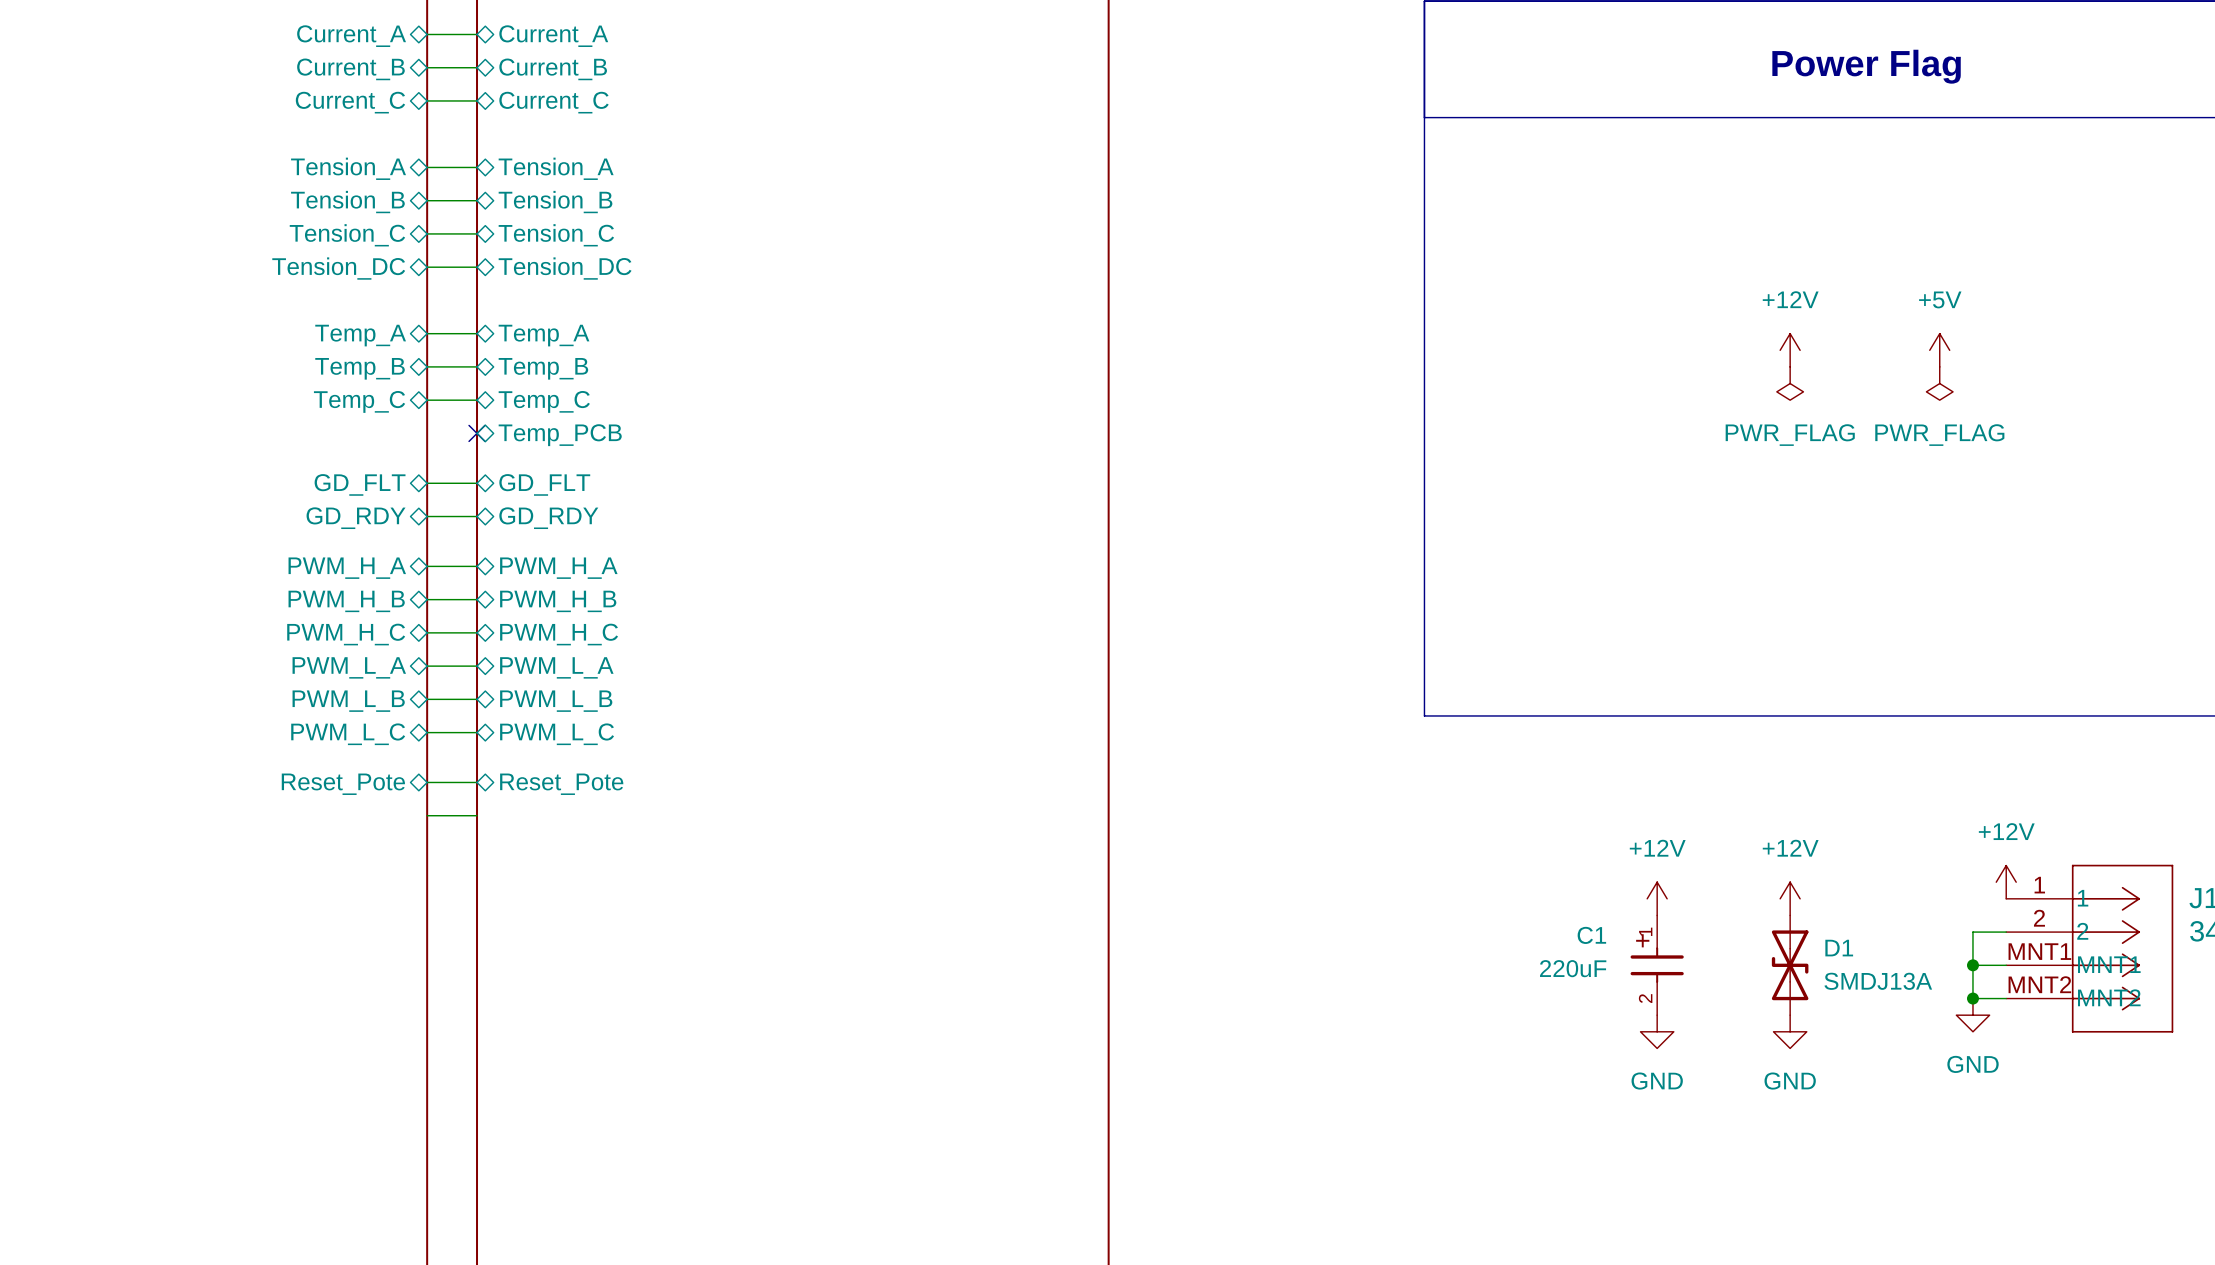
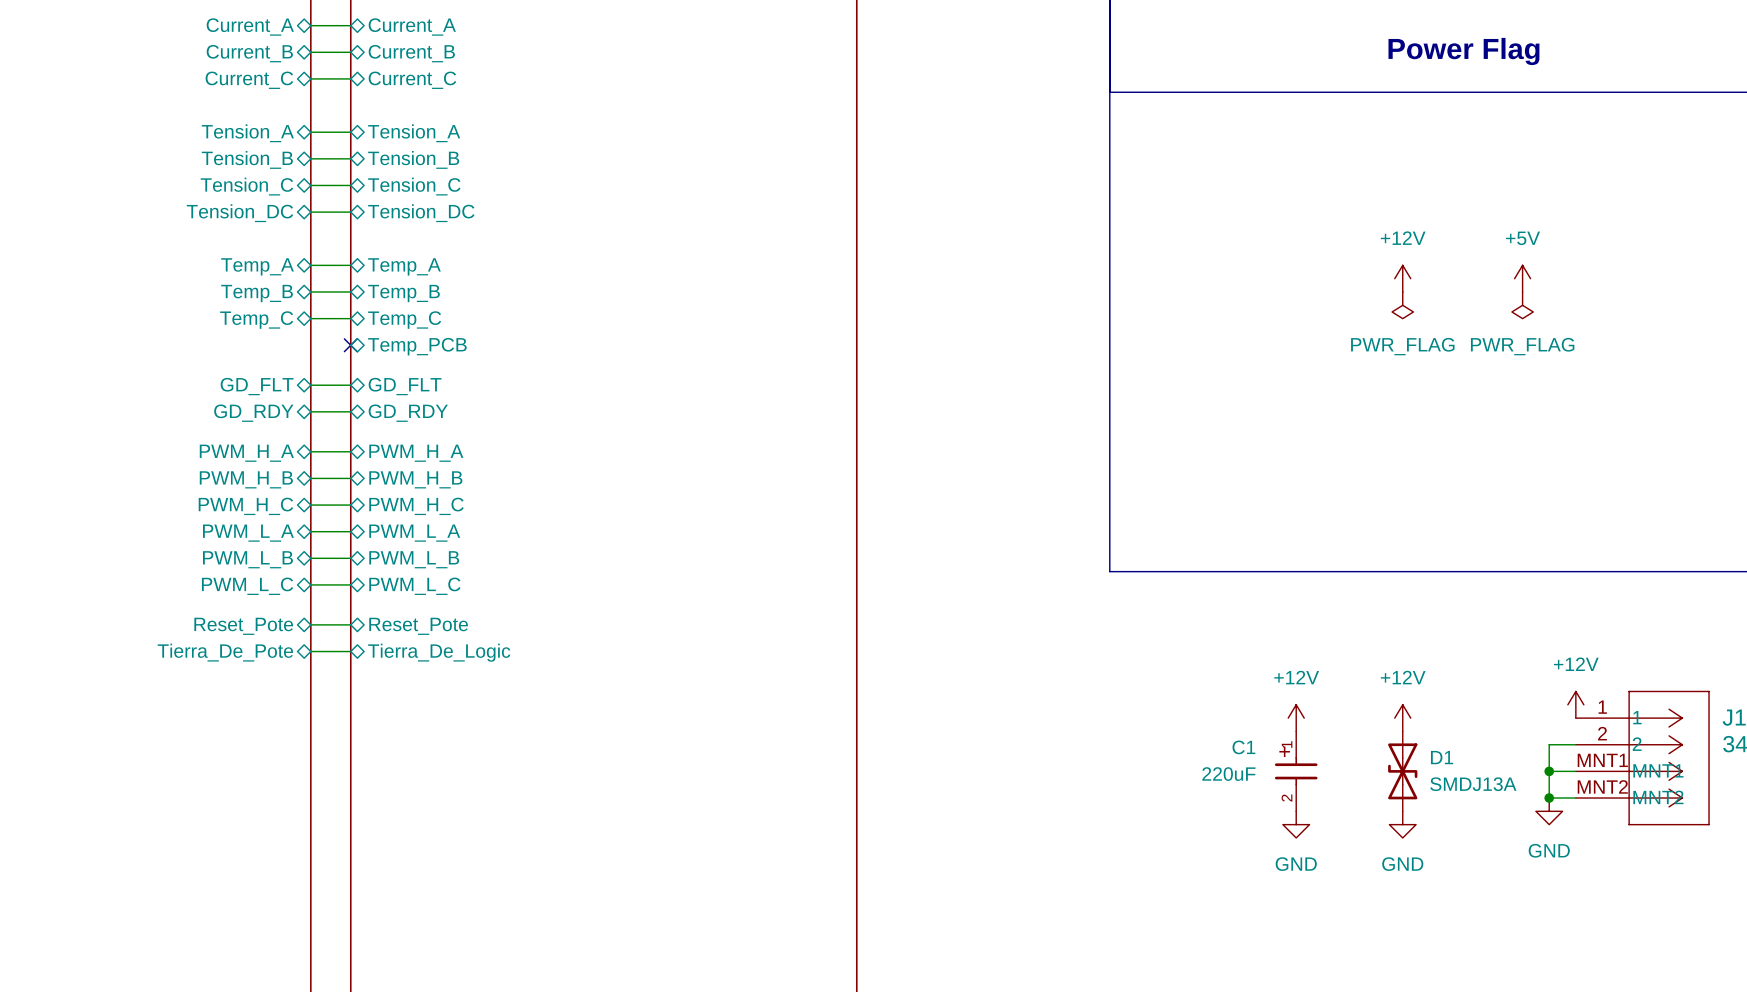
sheet pin: none -> Tierra_De_Pote (225, 652)
sheet pin: none -> Tierra_De_Logic (439, 652)

